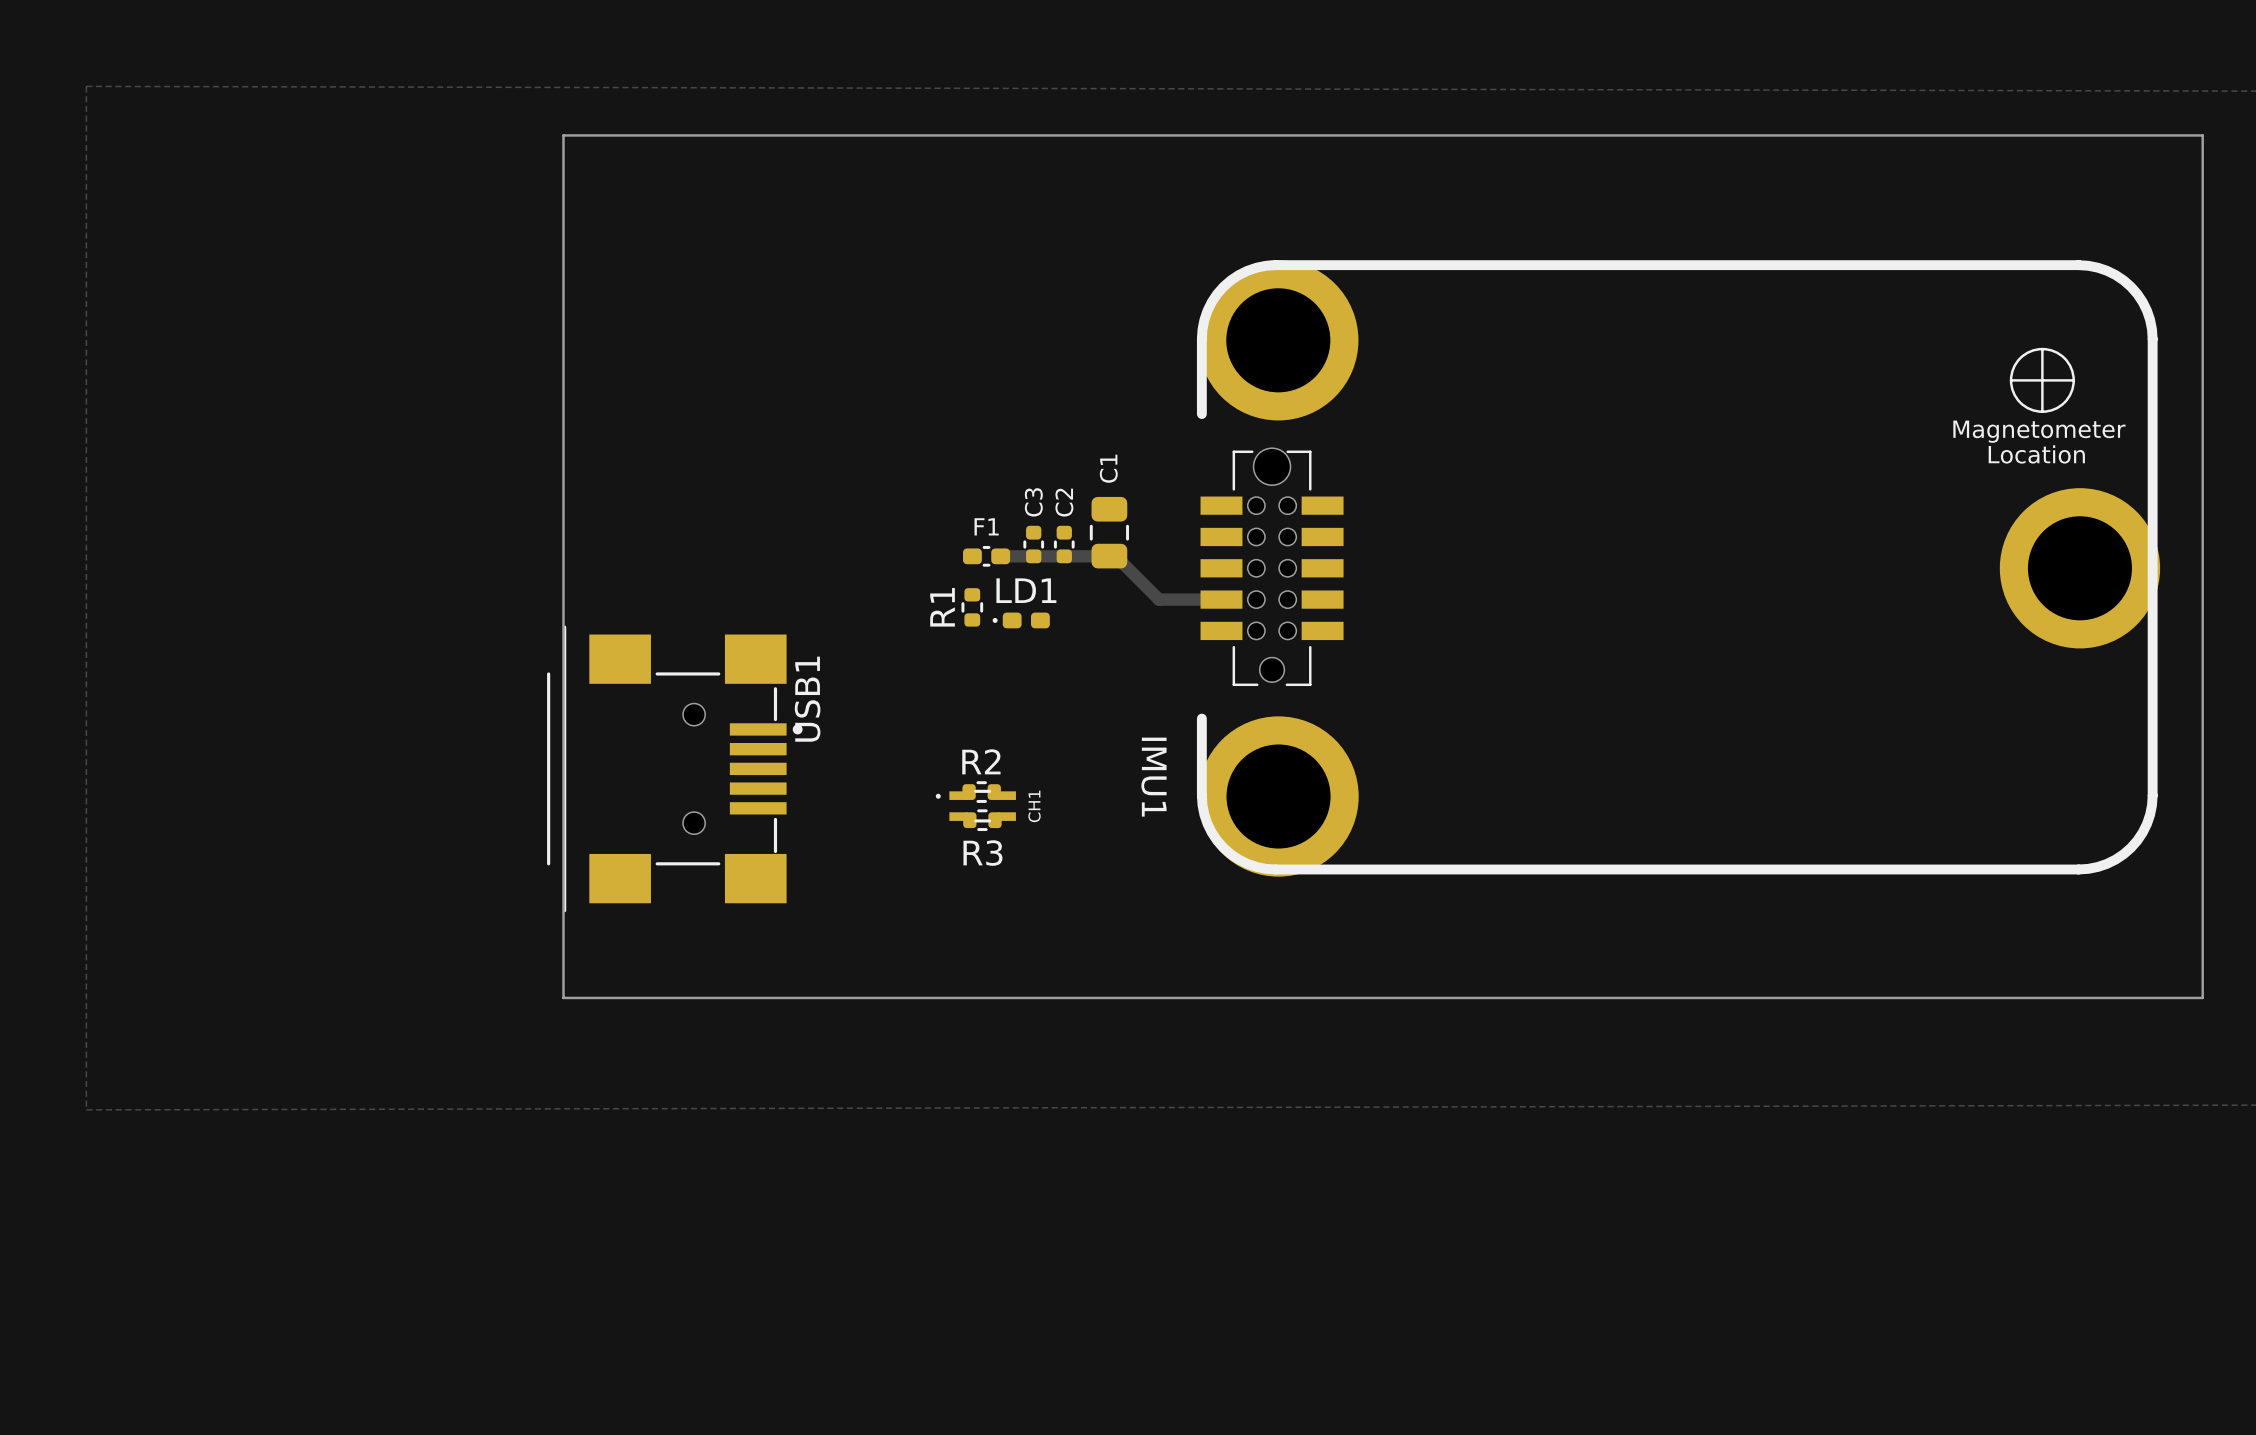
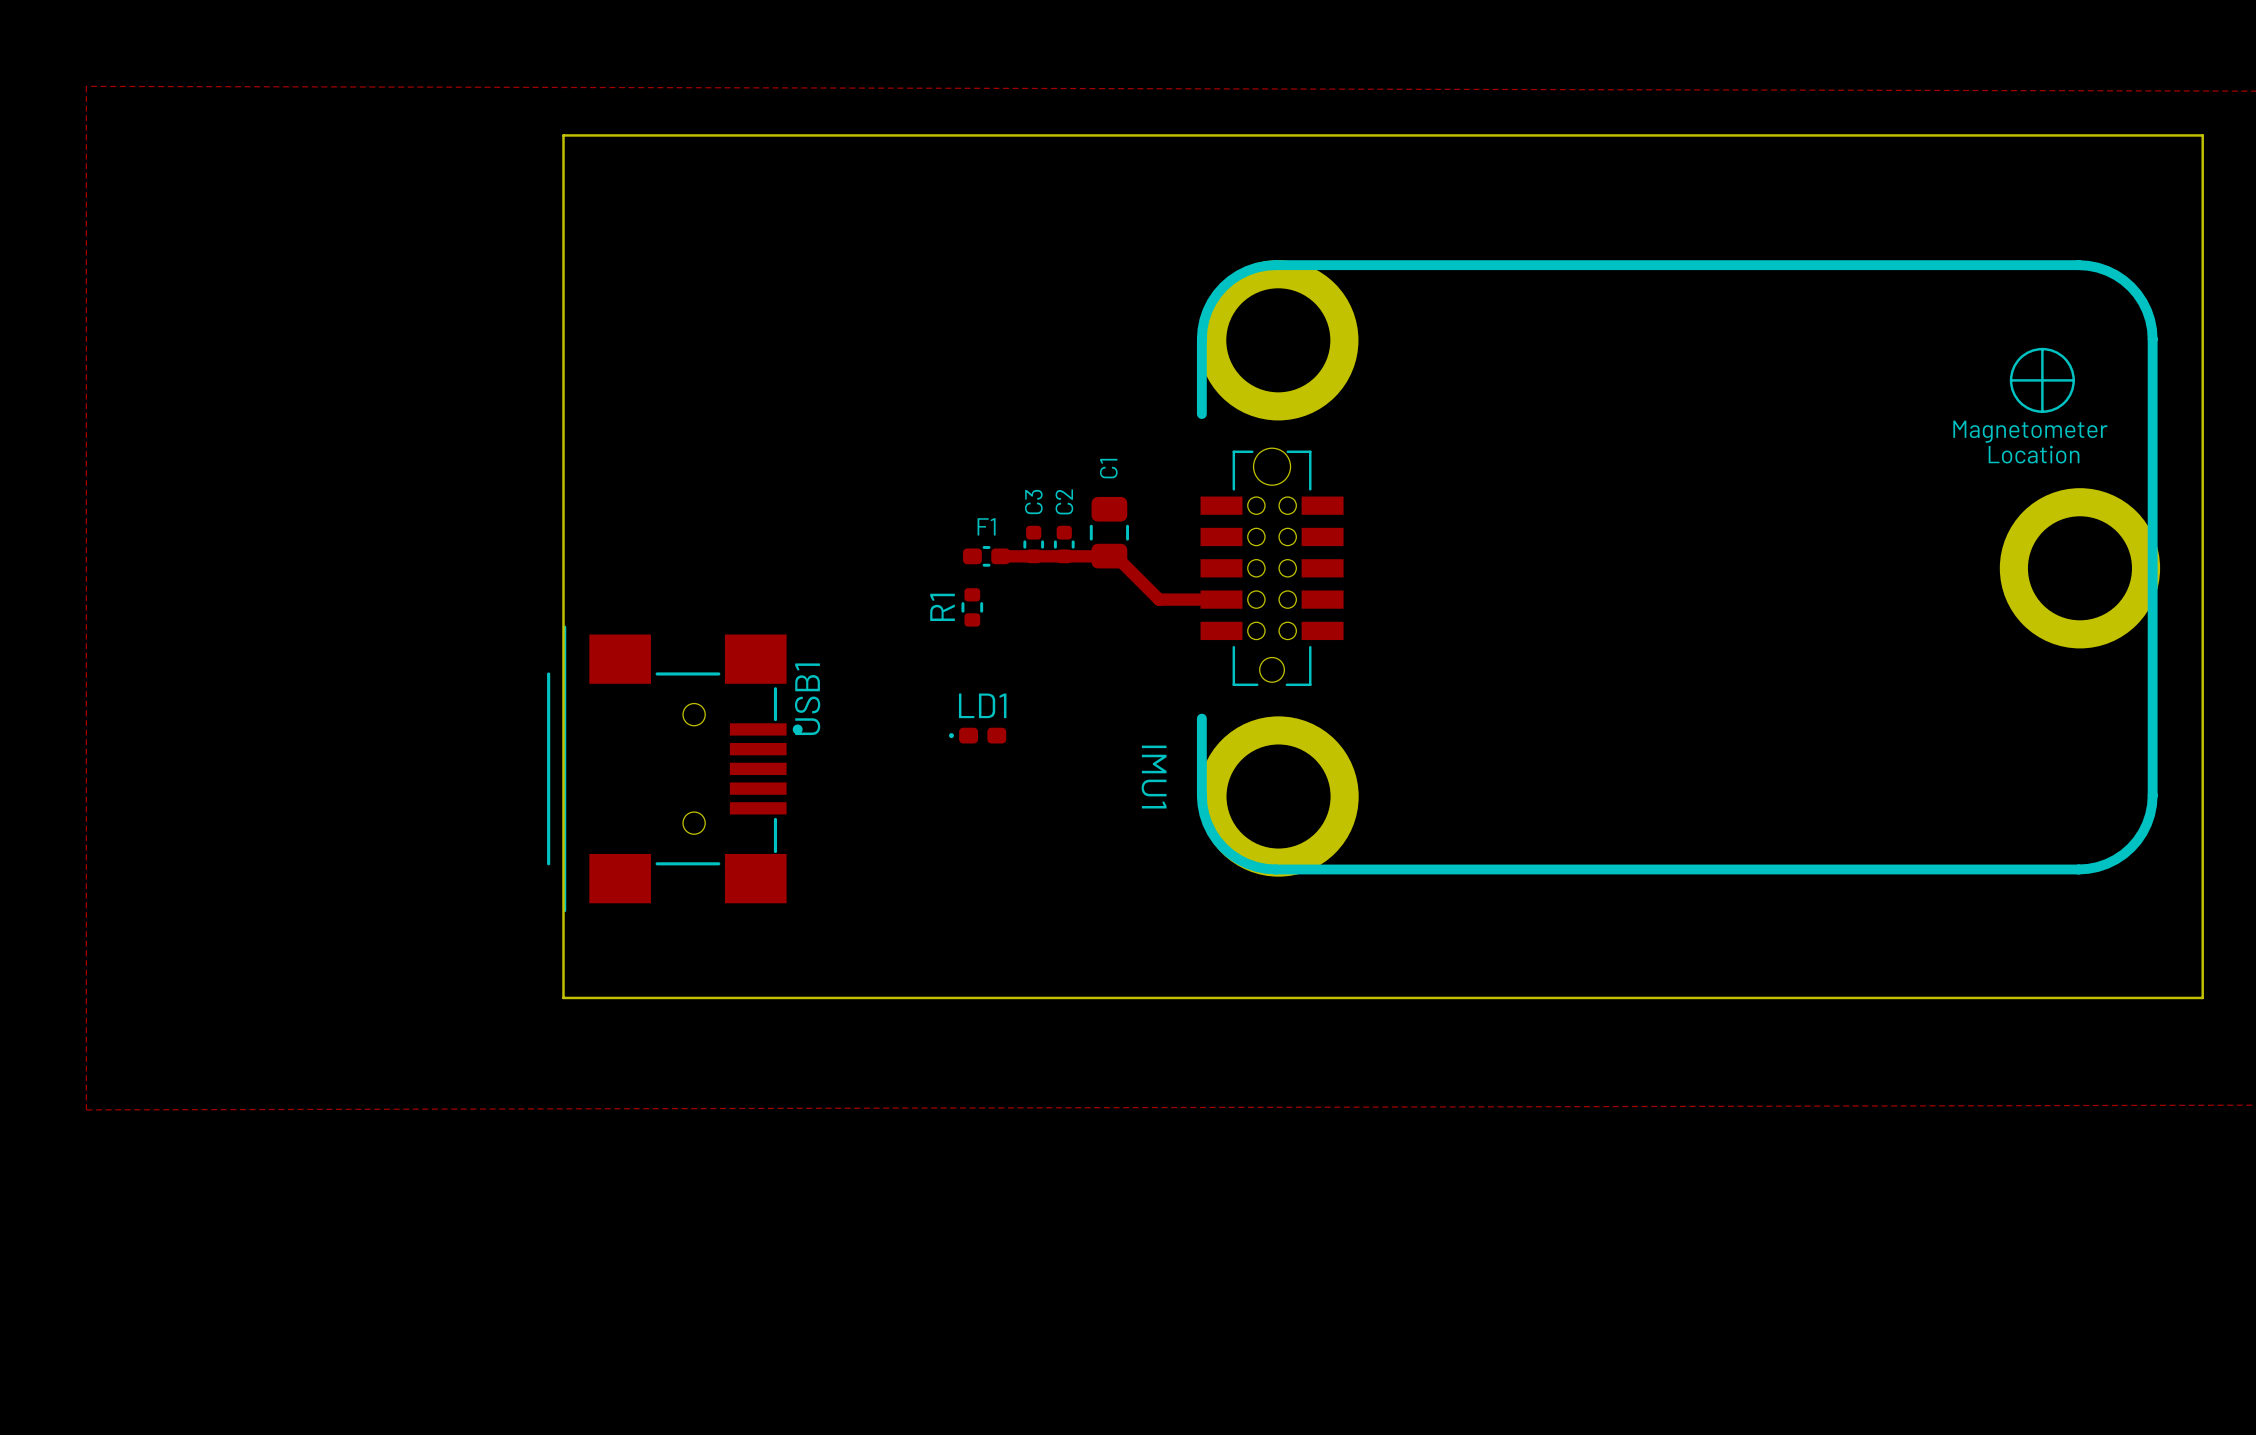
LD1 position: (1021, 620) -> (977, 735)
R2: (981, 792) -> none
CH1: (975, 806) -> none
R3: (982, 820) -> none

